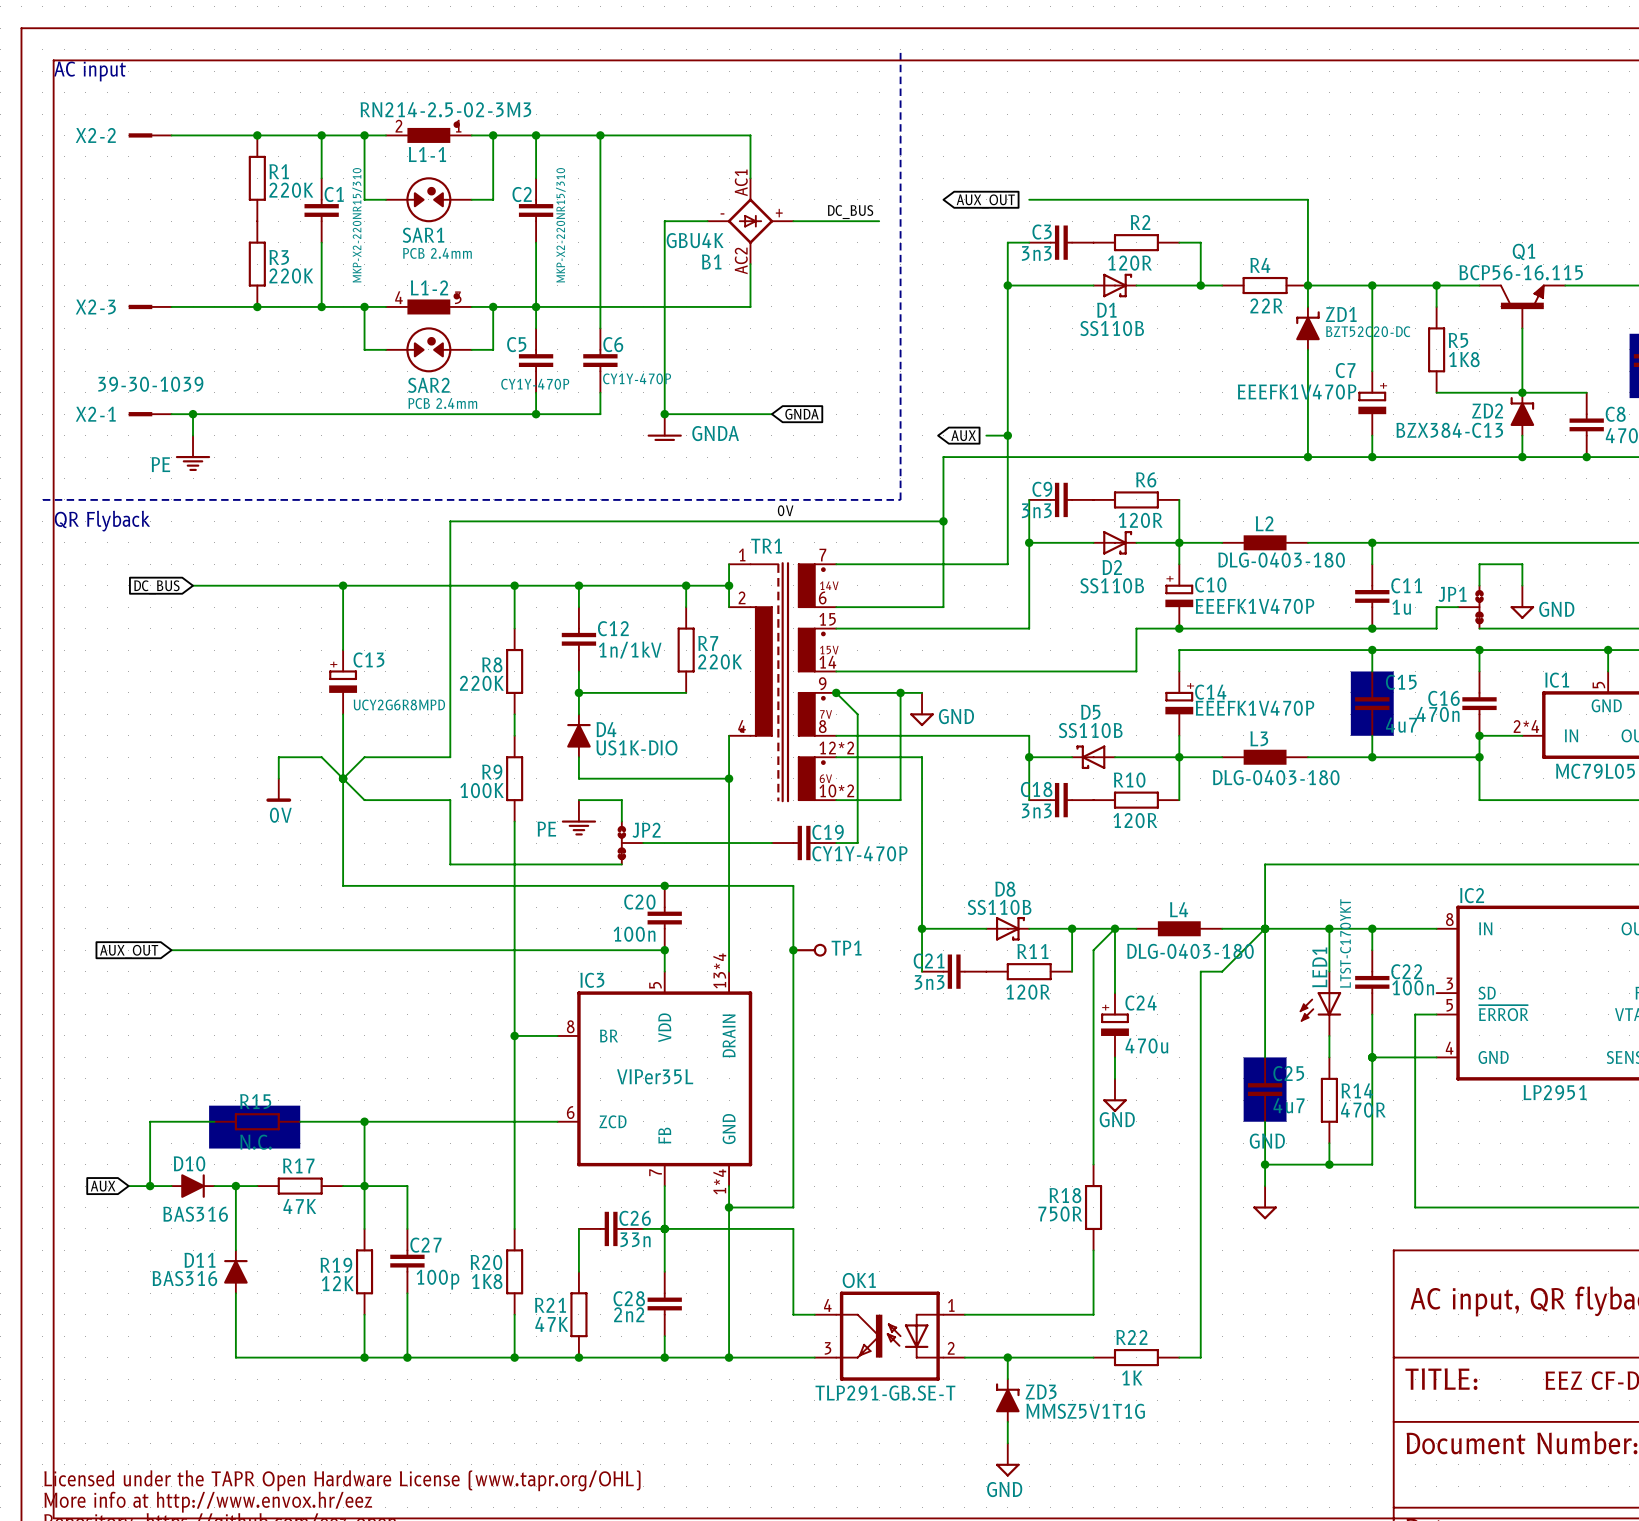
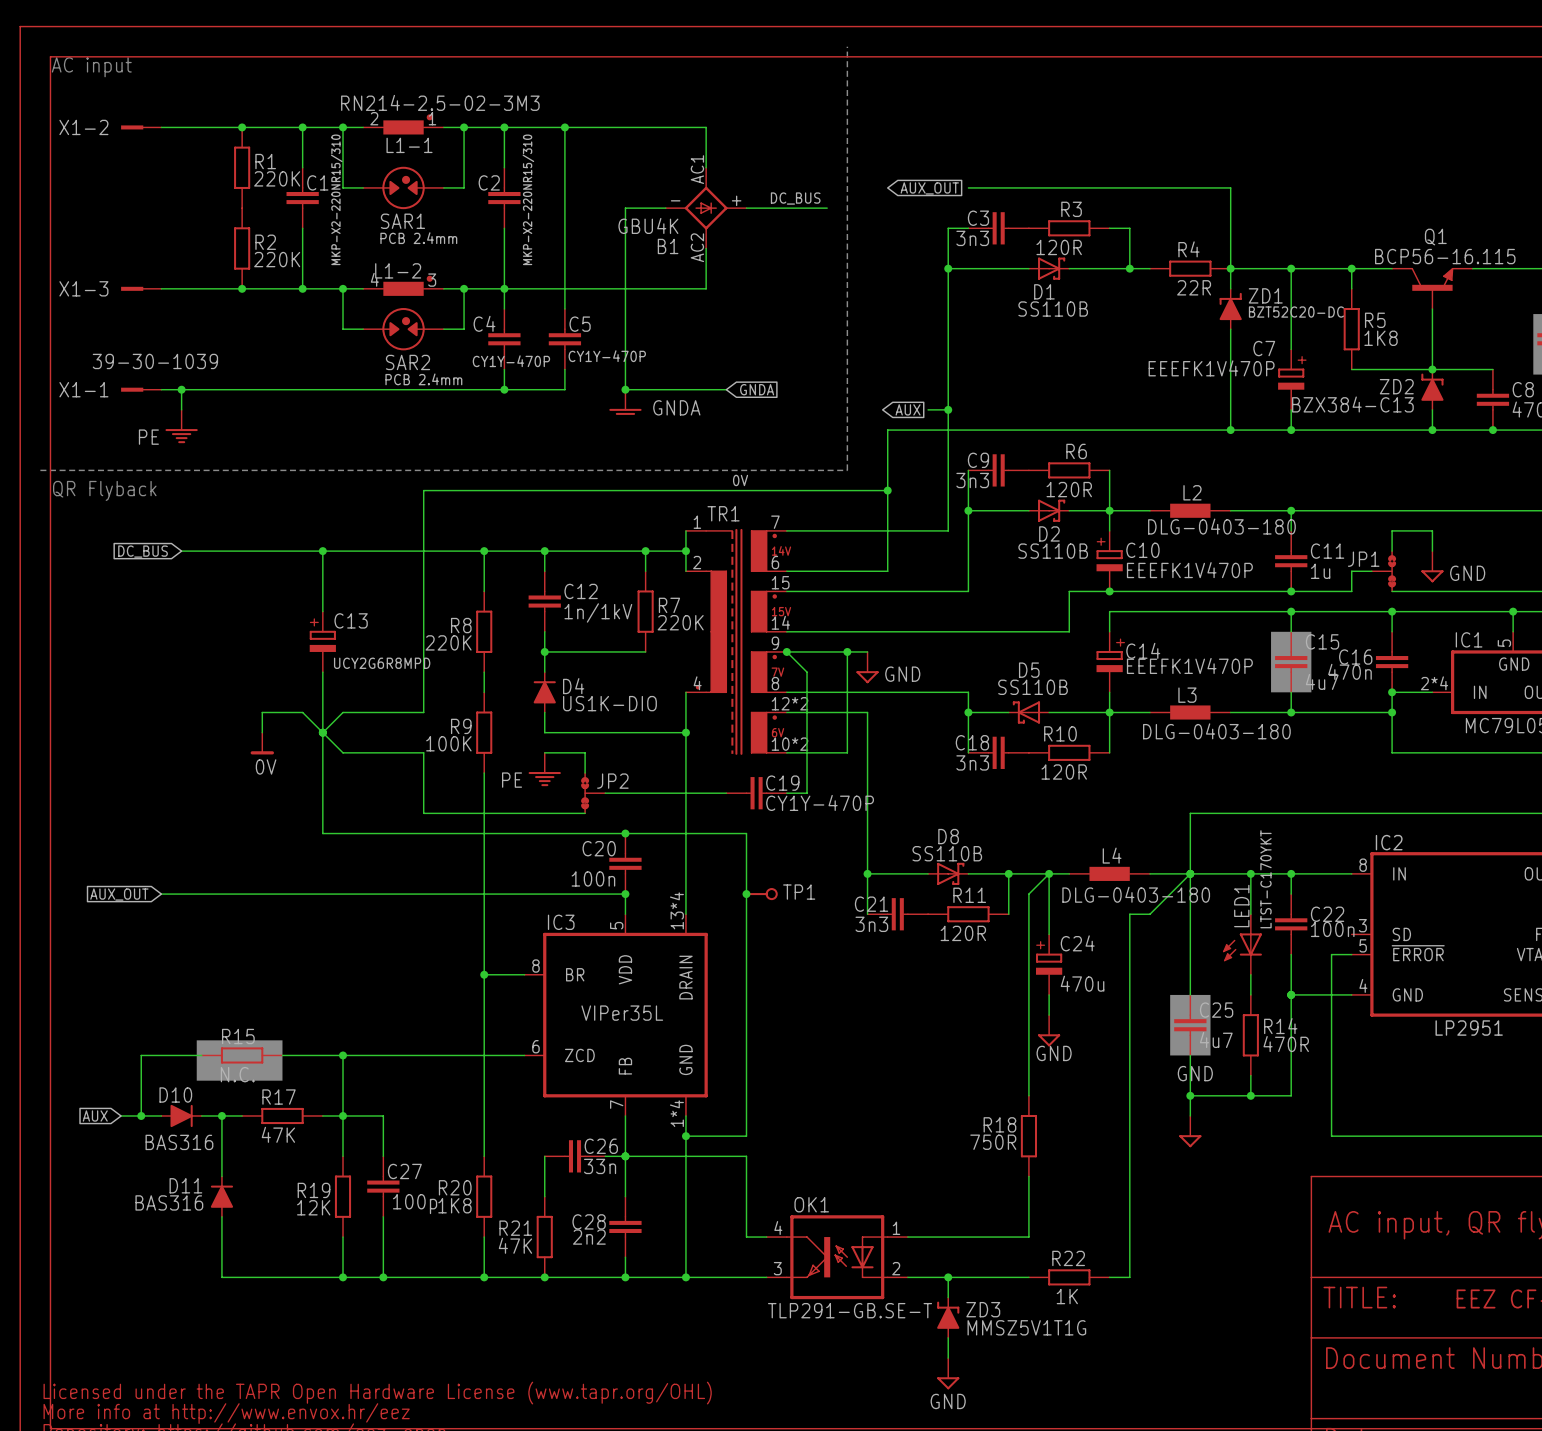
X2-2 name: X2-2 (95, 135) -> X1-2 (83, 127)
R2 name: R2 (1140, 222) -> R3 (1071, 209)
R3 name: R3 (279, 257) -> R2 (265, 242)
X2-3 name: X2-3 (95, 306) -> X1-3 (83, 288)
C5 name: C5 (516, 344) -> C4 (484, 323)
C6 name: C6 (613, 344) -> C5 (580, 324)
X2-1 name: X2-1 (95, 414) -> X1-1 (83, 389)

